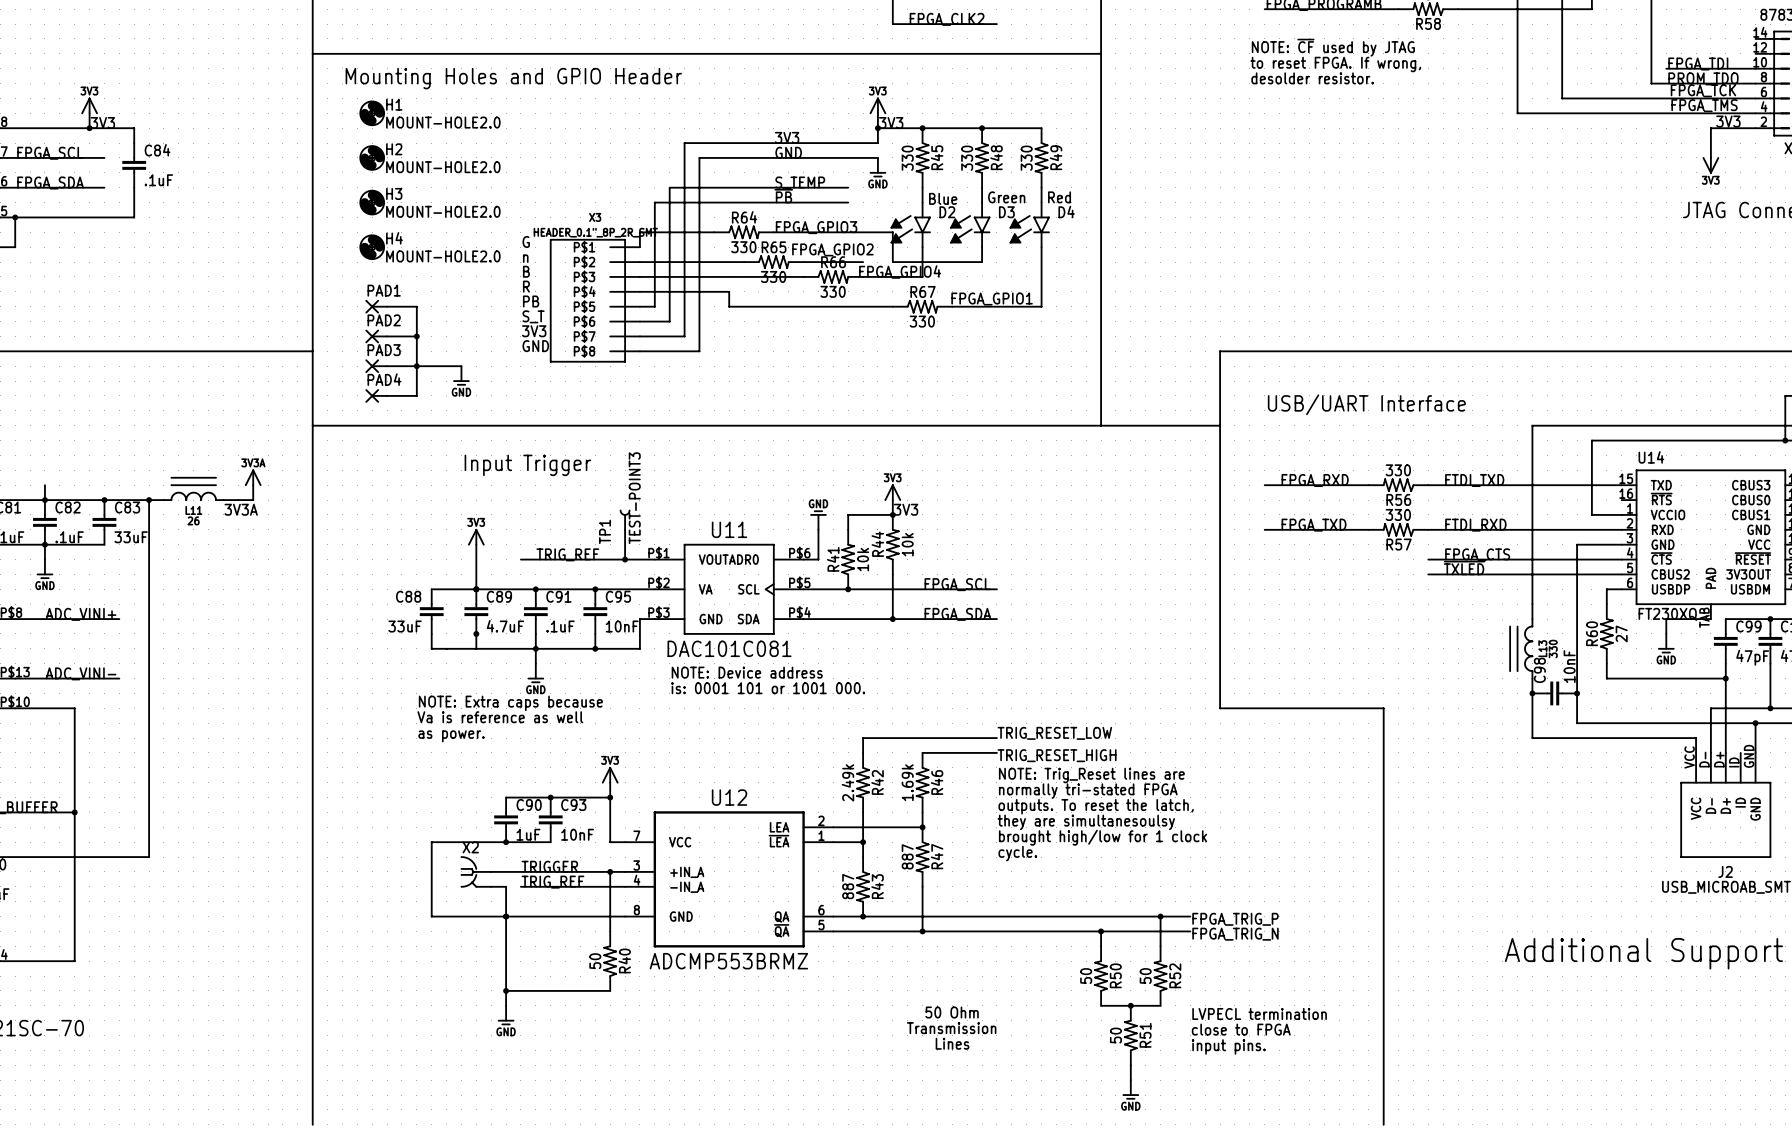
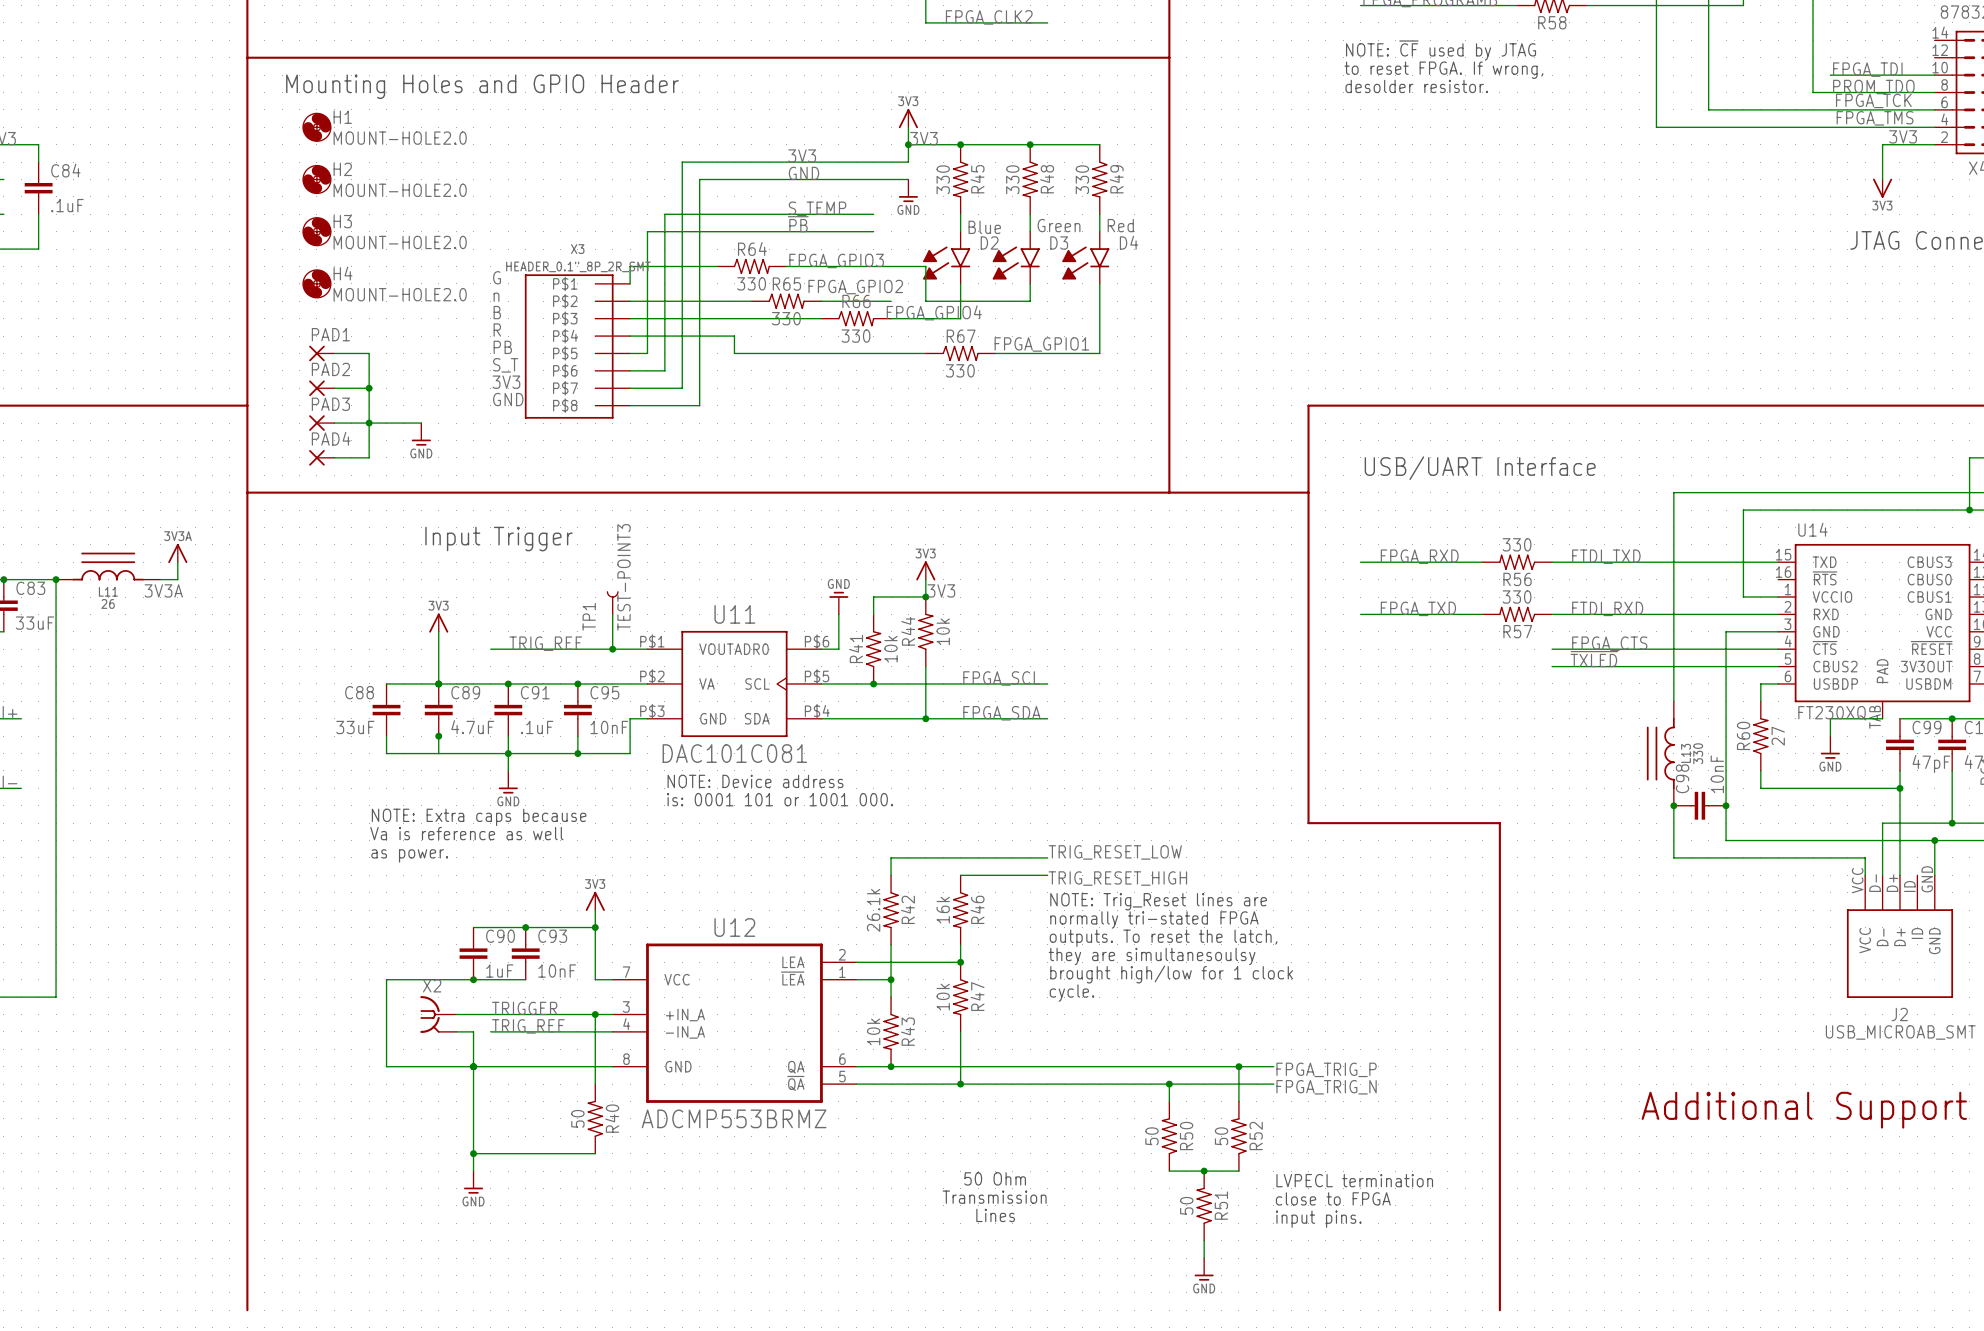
R42 value: 2.49k (847, 782) -> 26.1k (873, 910)
R46 value: 1.69k (907, 782) -> 16k (943, 910)
R47 value: 887 (907, 856) -> 10k (943, 997)
R43 value: 887 (848, 886) -> 10k (873, 1031)

